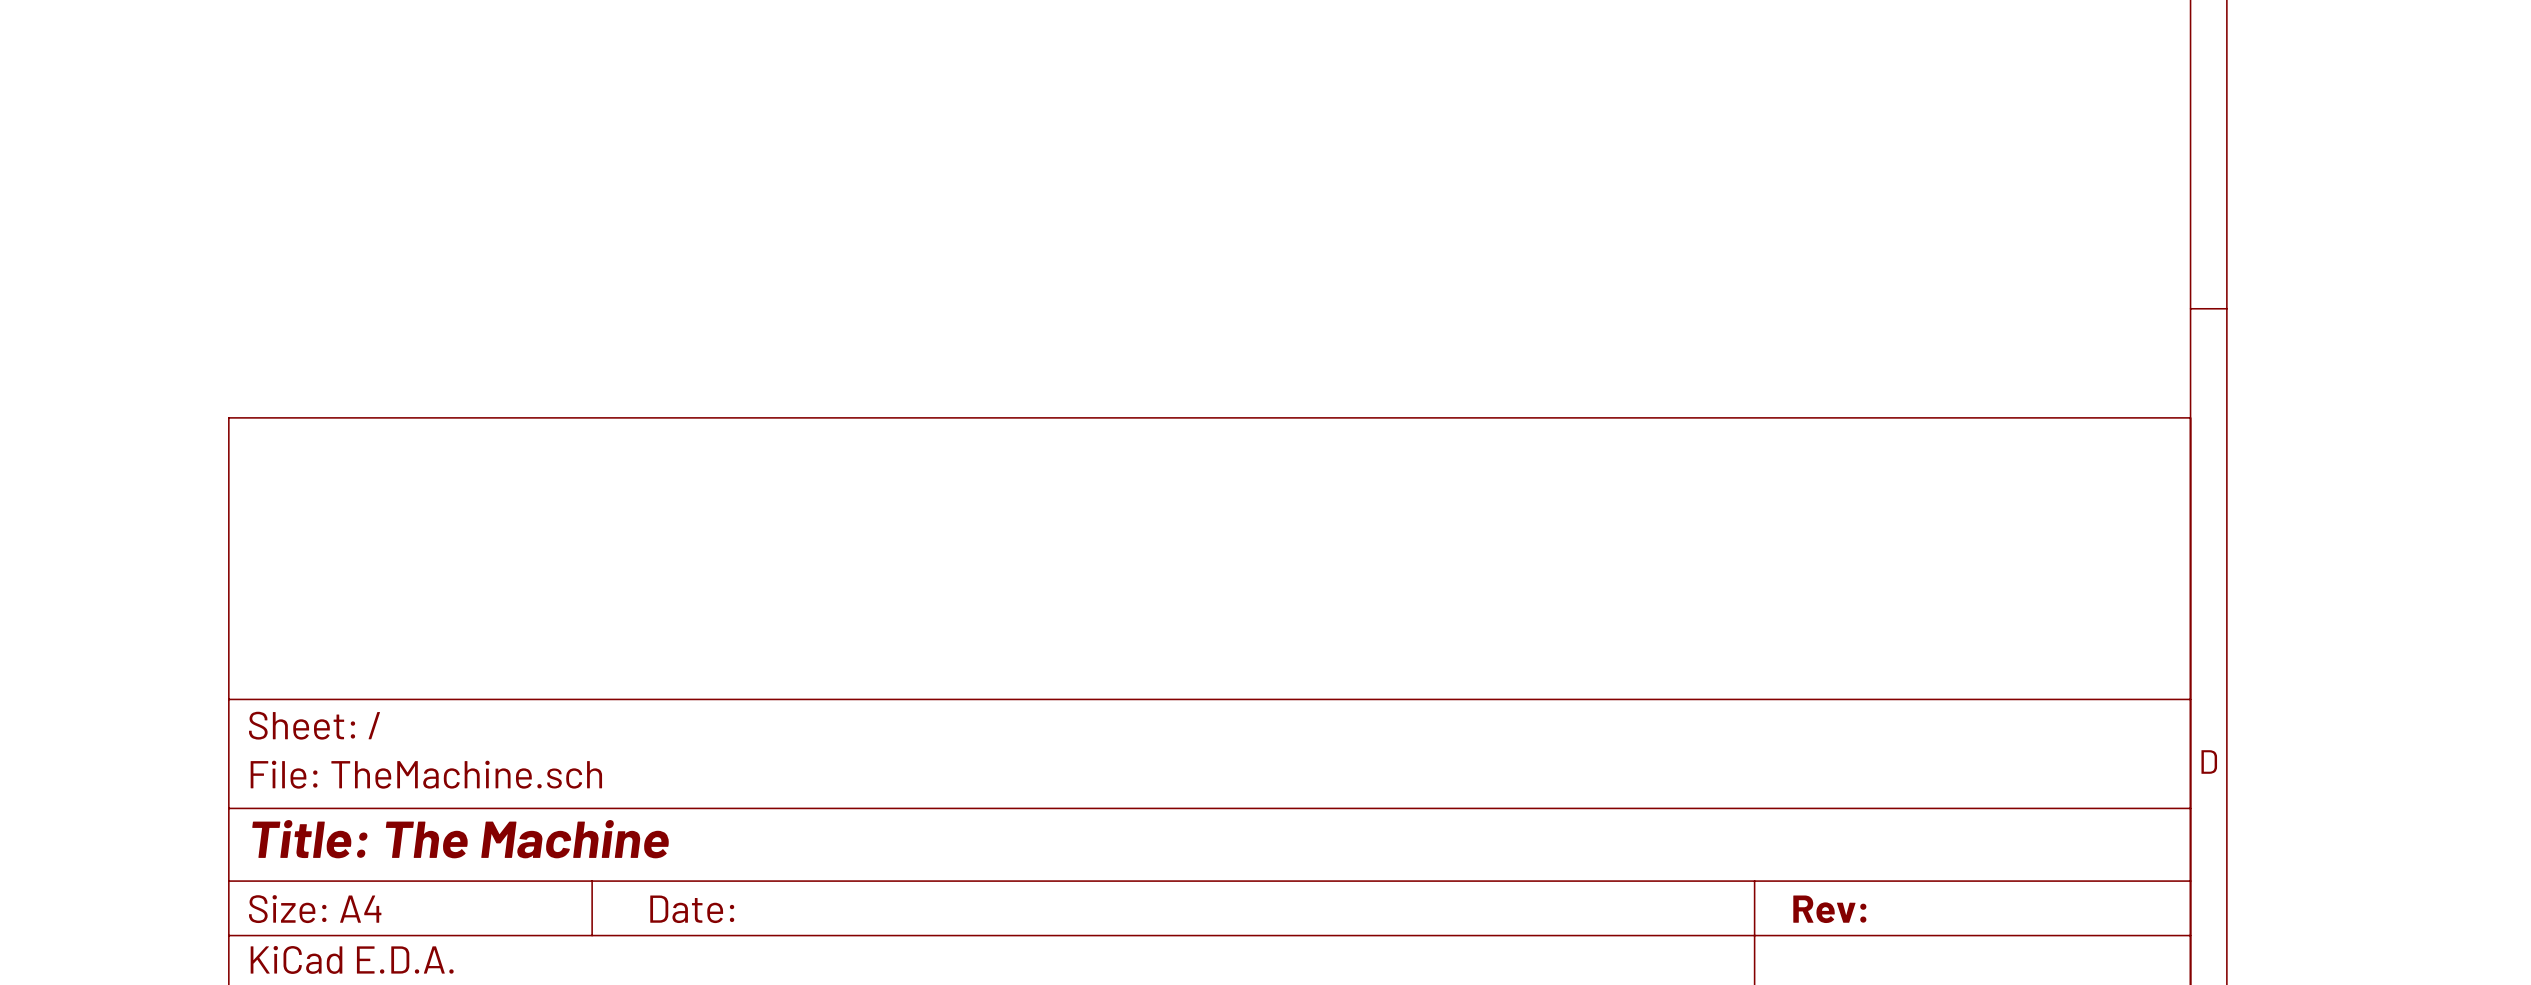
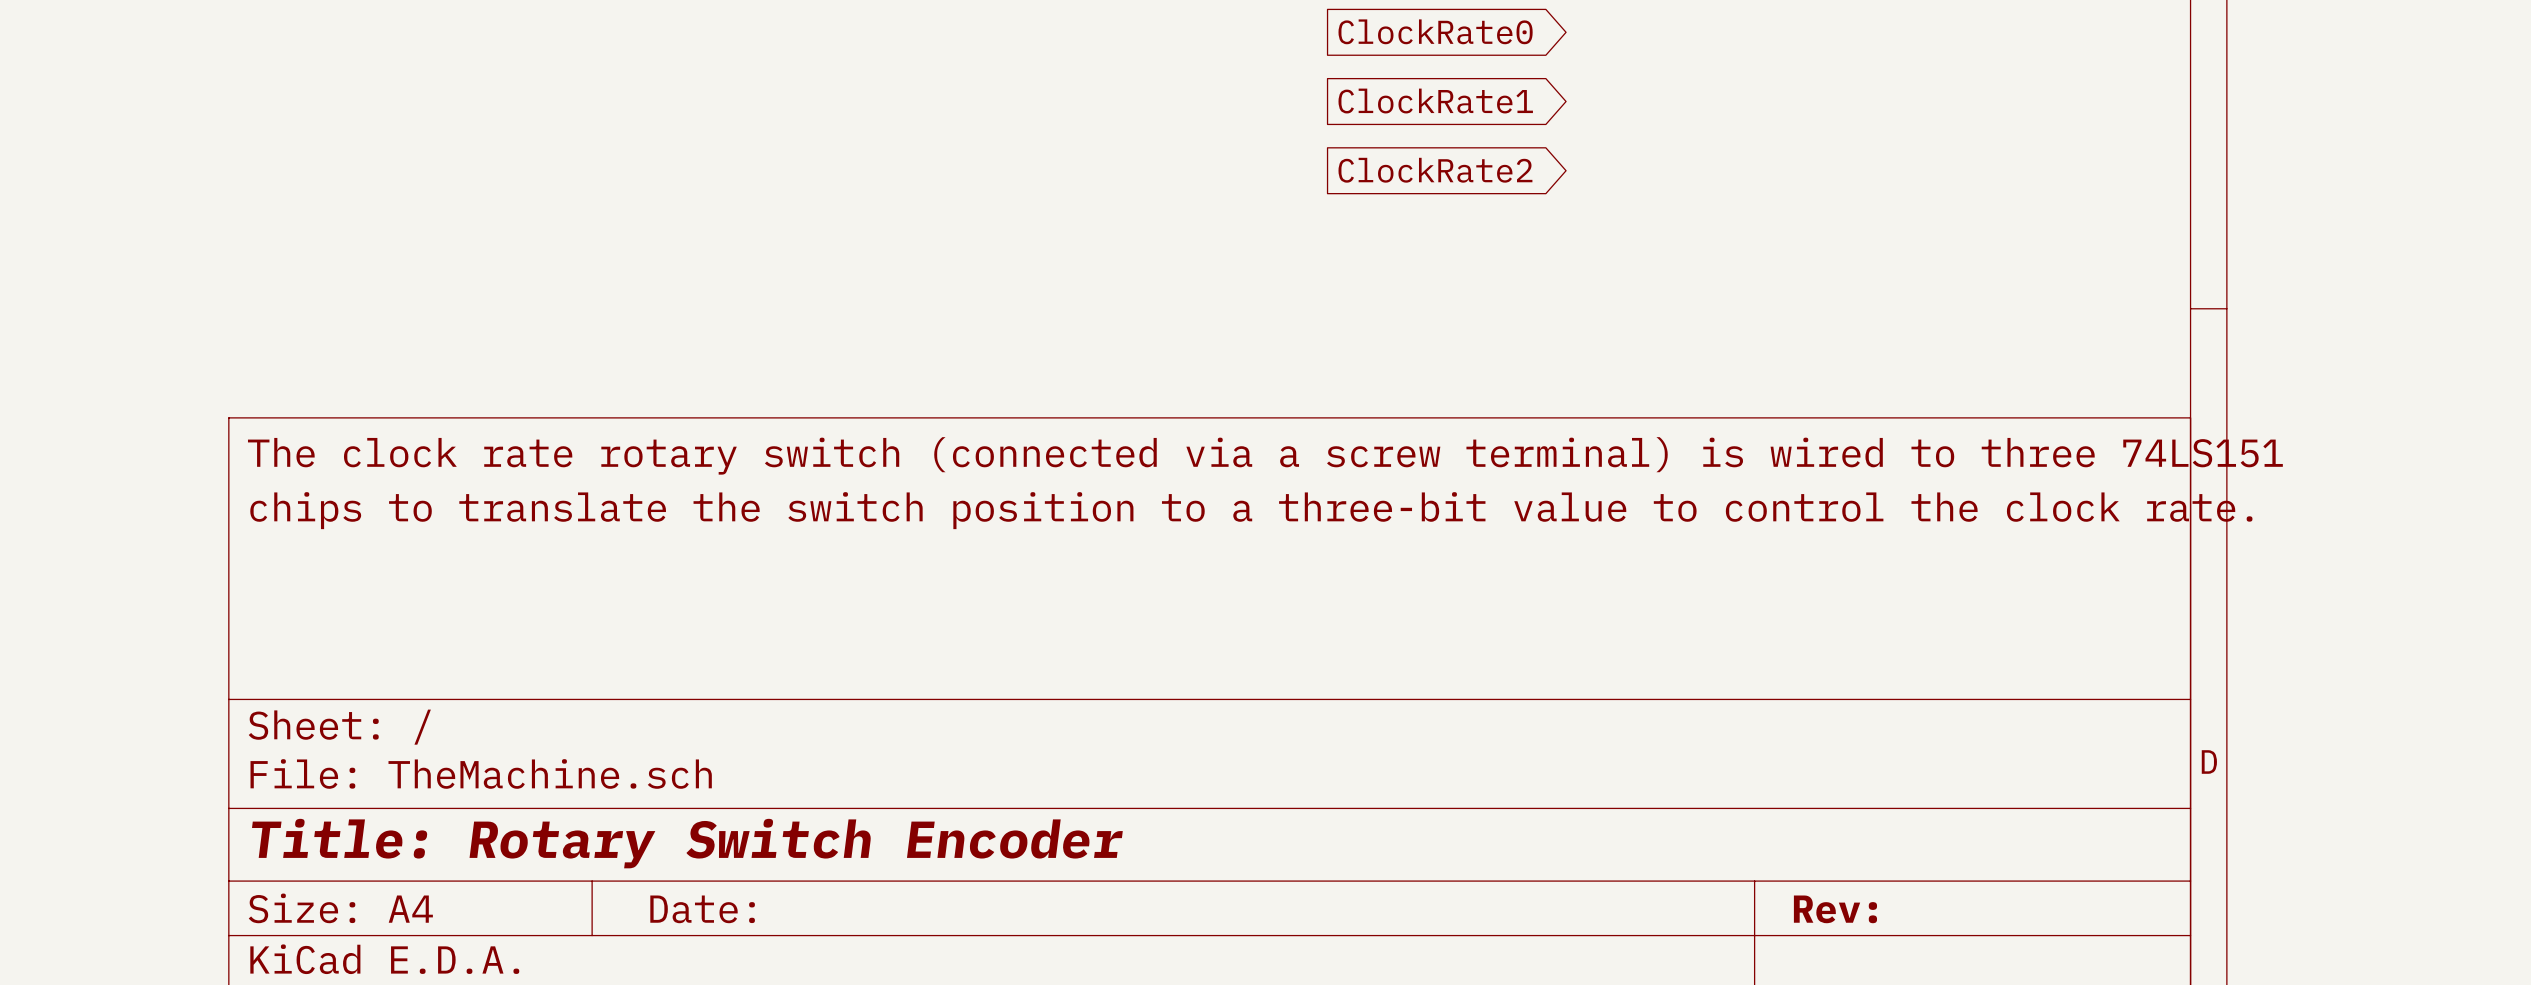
global label: none -> ClockRate0 (1435, 31)
global label: none -> ClockRate1 (1435, 101)
global label: none -> ClockRate2 (1435, 170)
title block: none -> The clock rate rotary switch (connected via a screw terminal) is wired to three 74LS151 (1265, 455)
title block: none -> chips to translate the switch position to a three-bit value to control the clock rate. (1251, 510)
title block: Title: The Machine (460, 839) -> Title: Rotary Switch Encoder (687, 843)

